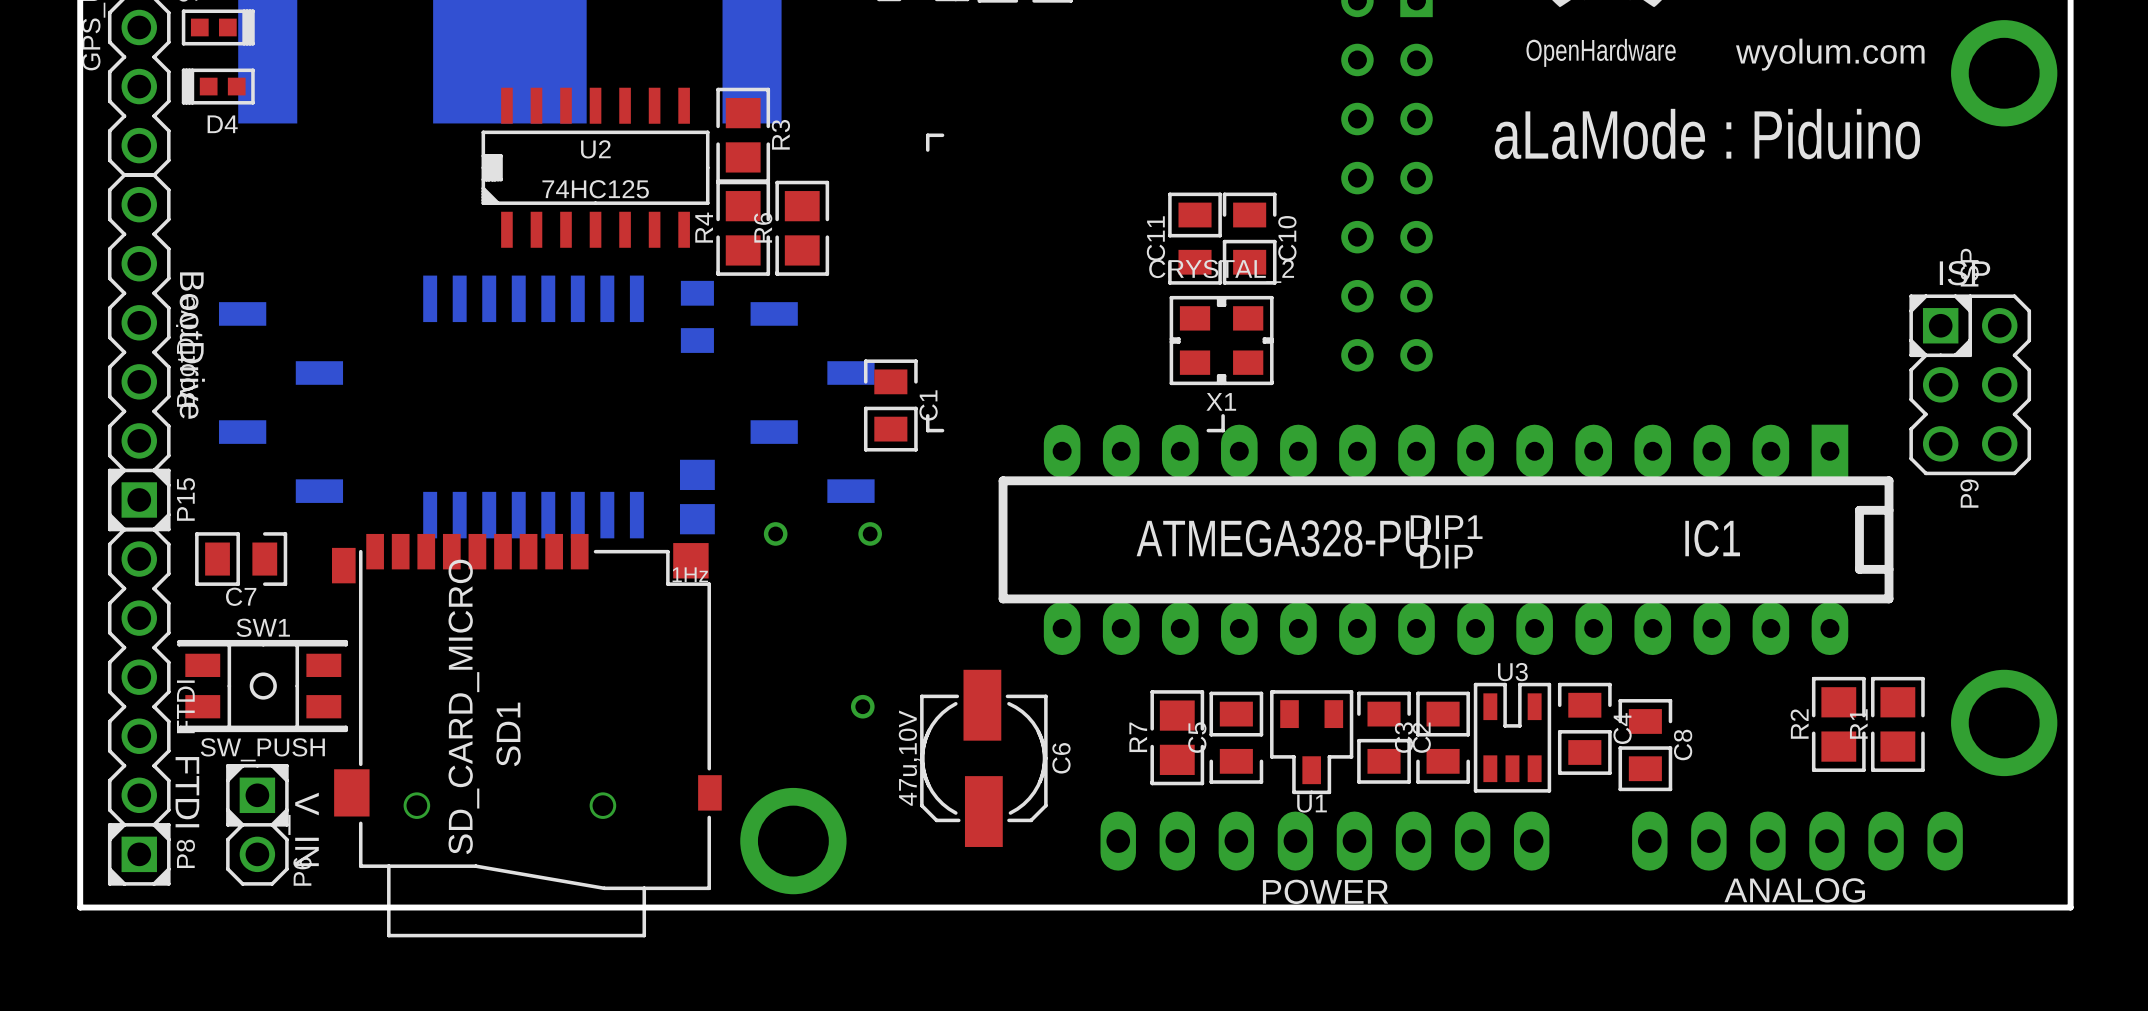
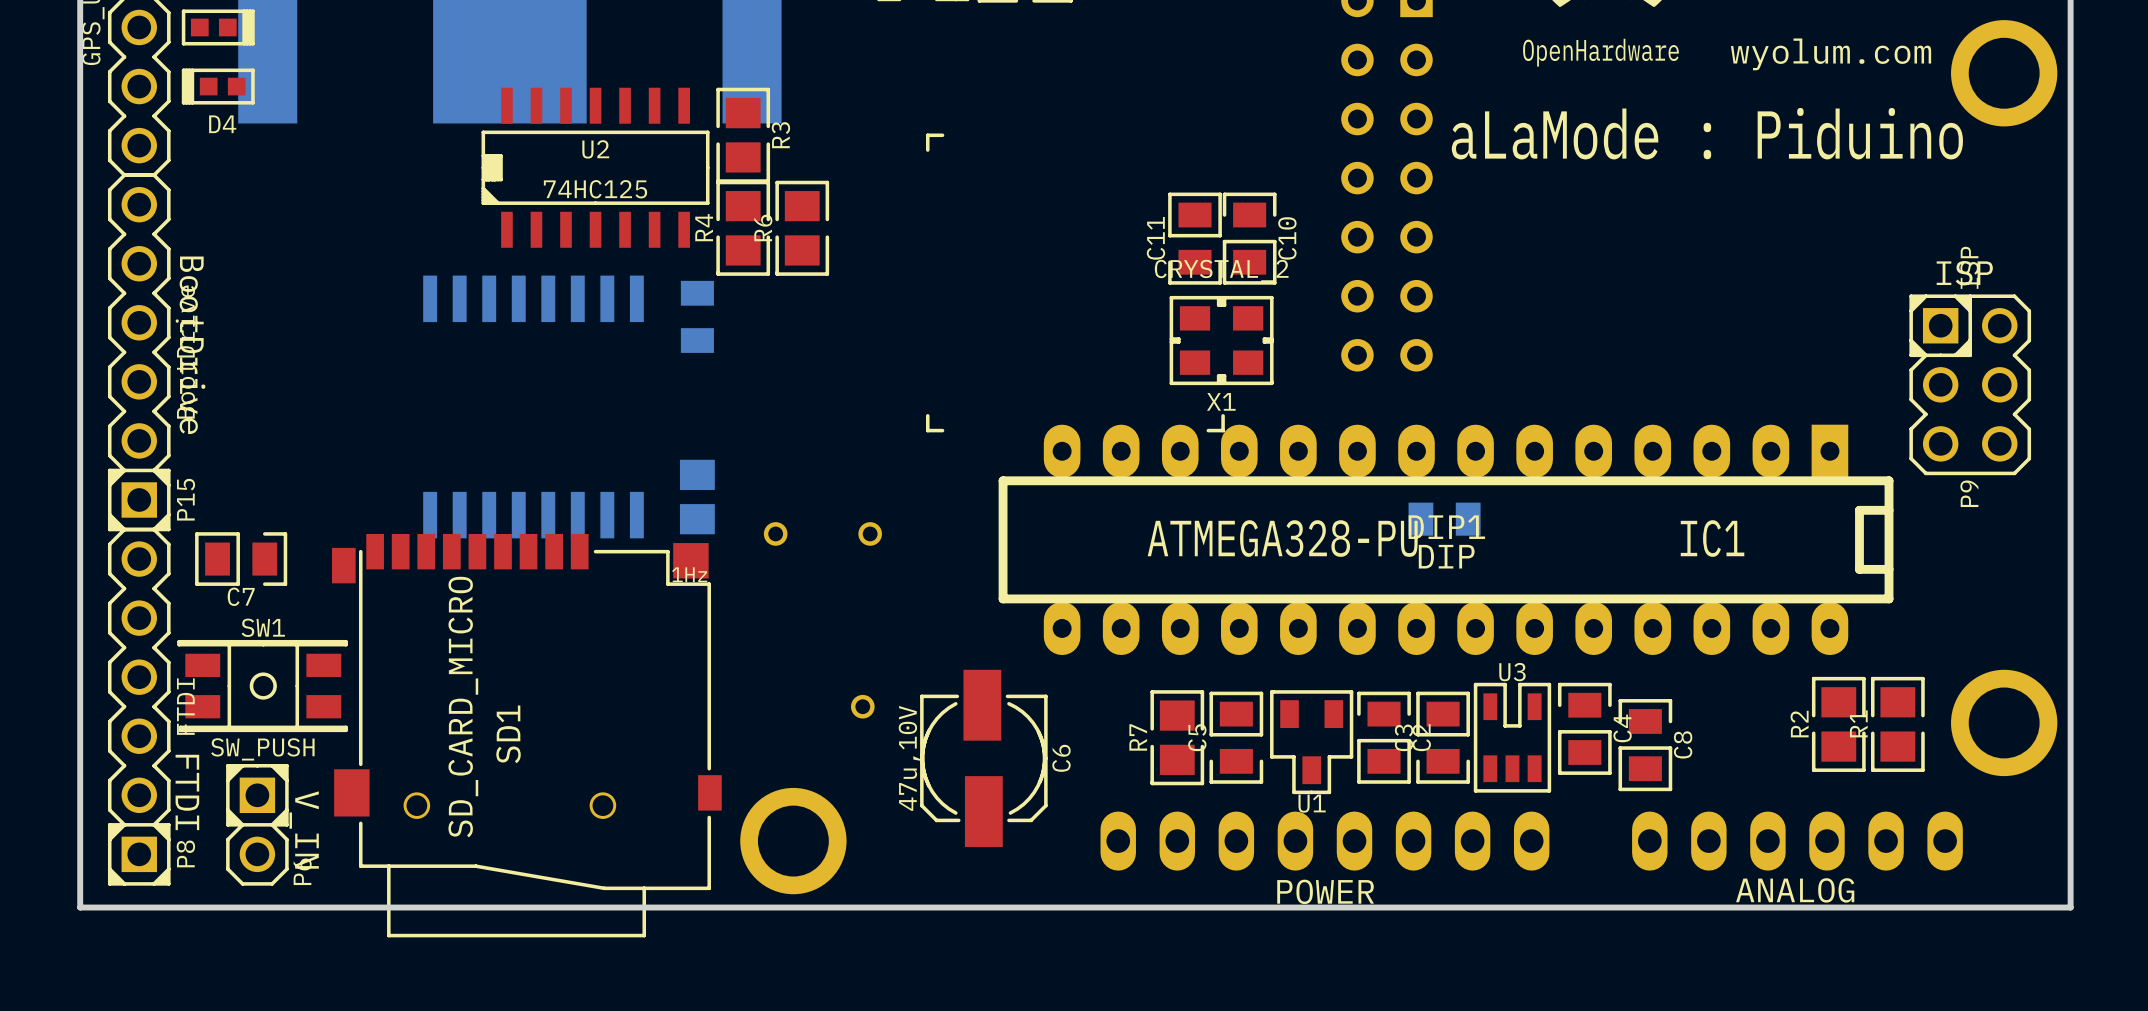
part: (281, 402) -> none
part: (812, 402) -> none
C1 side: top (890, 405) -> bottom (1444, 519)

